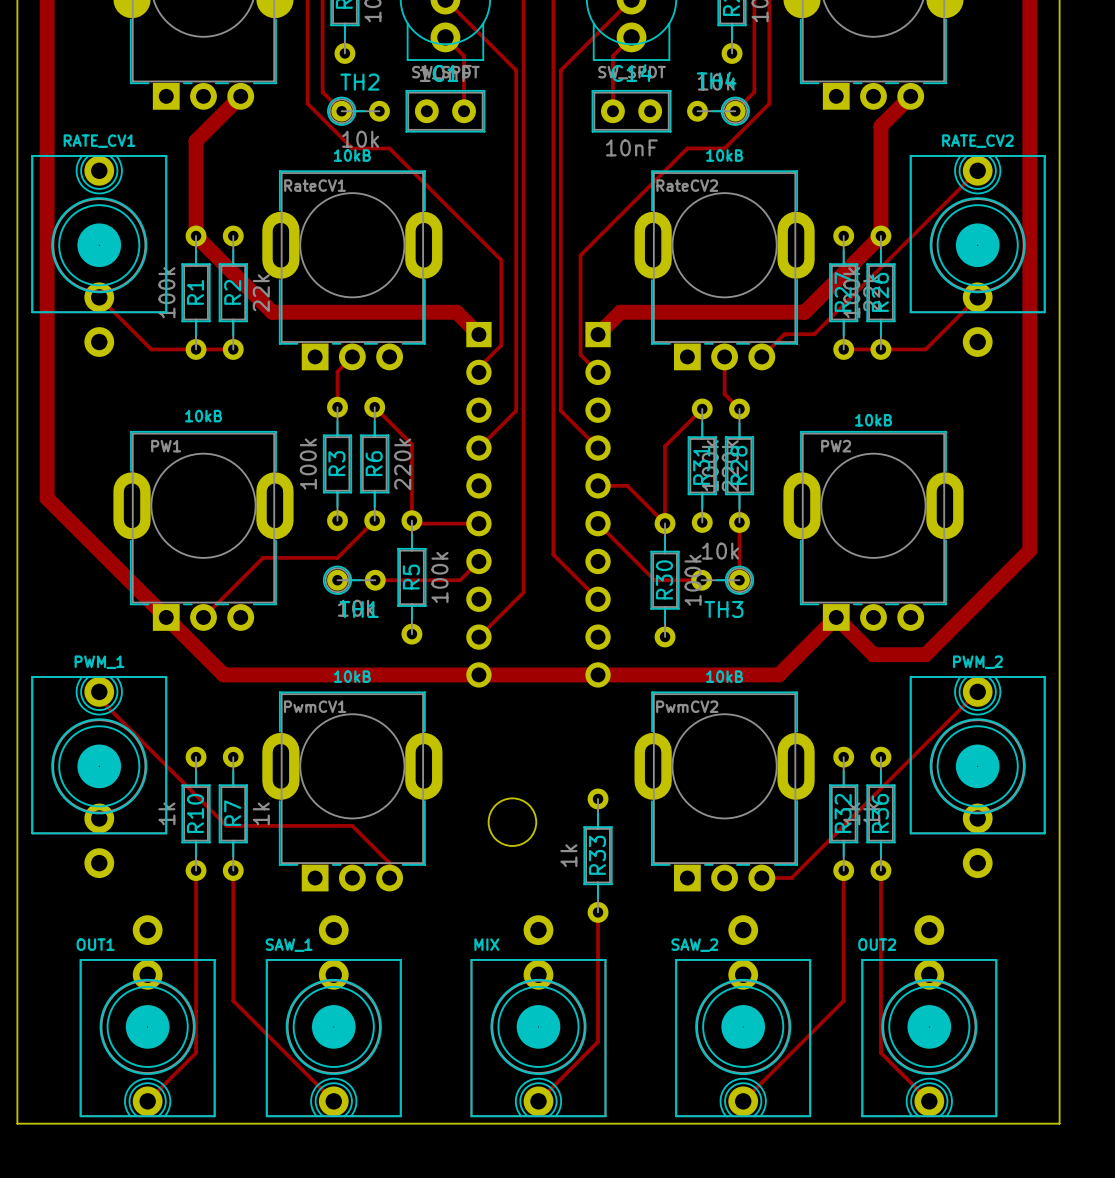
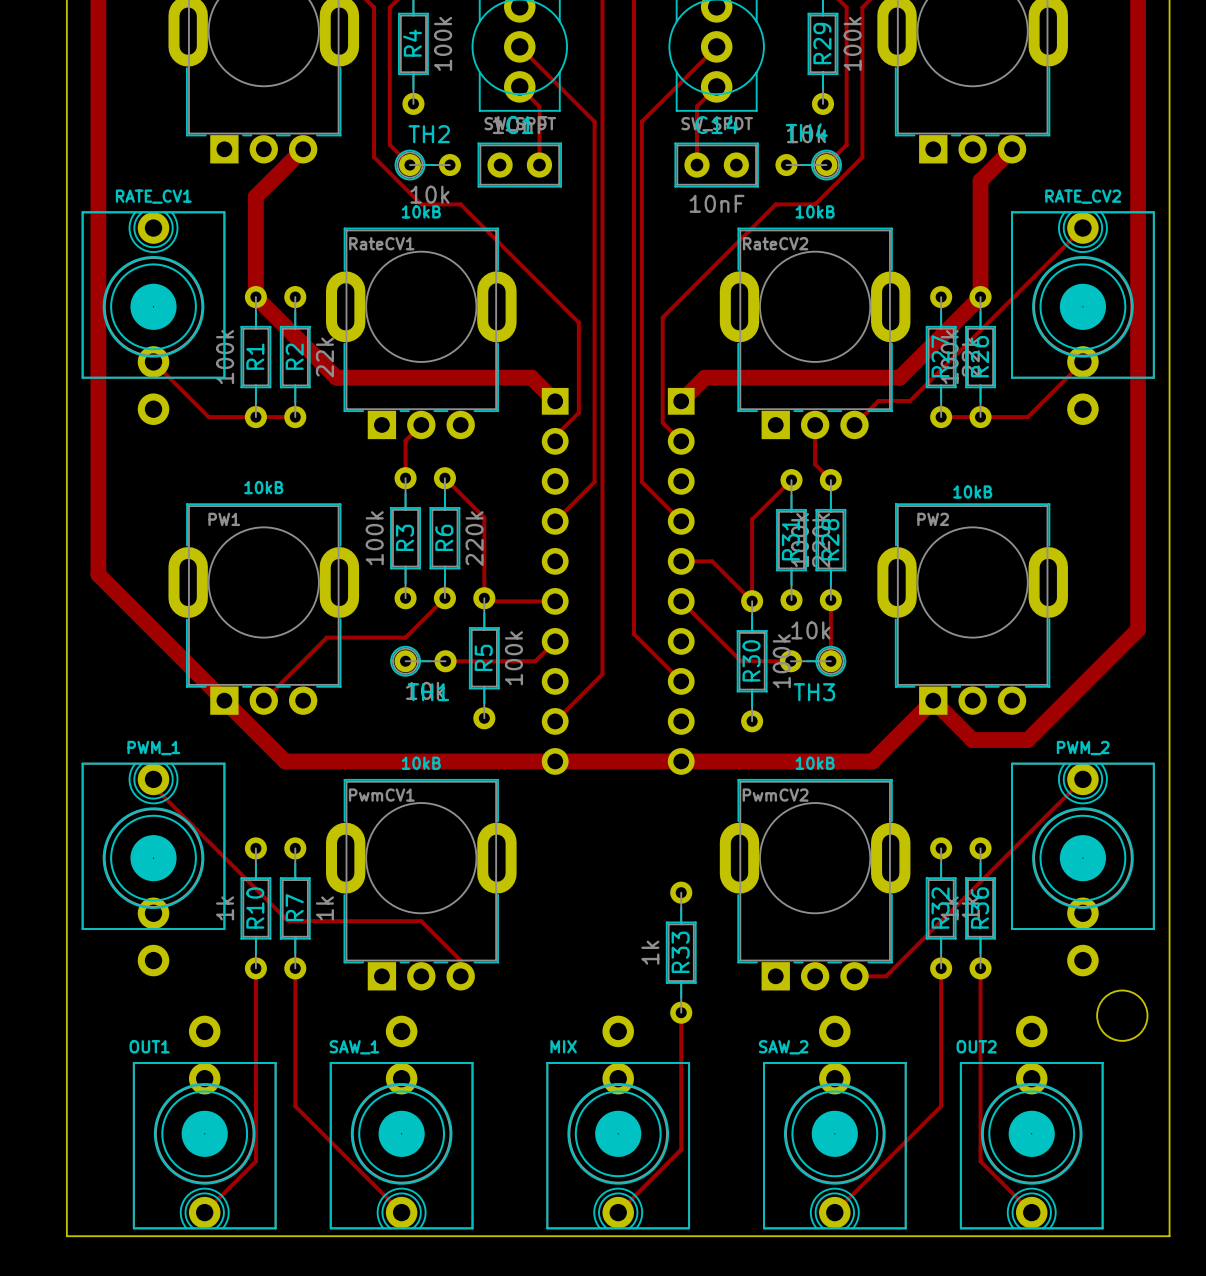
round board edge: [487, 797, 538, 847] -> none
round board edge: none -> [1096, 989, 1149, 1042]

